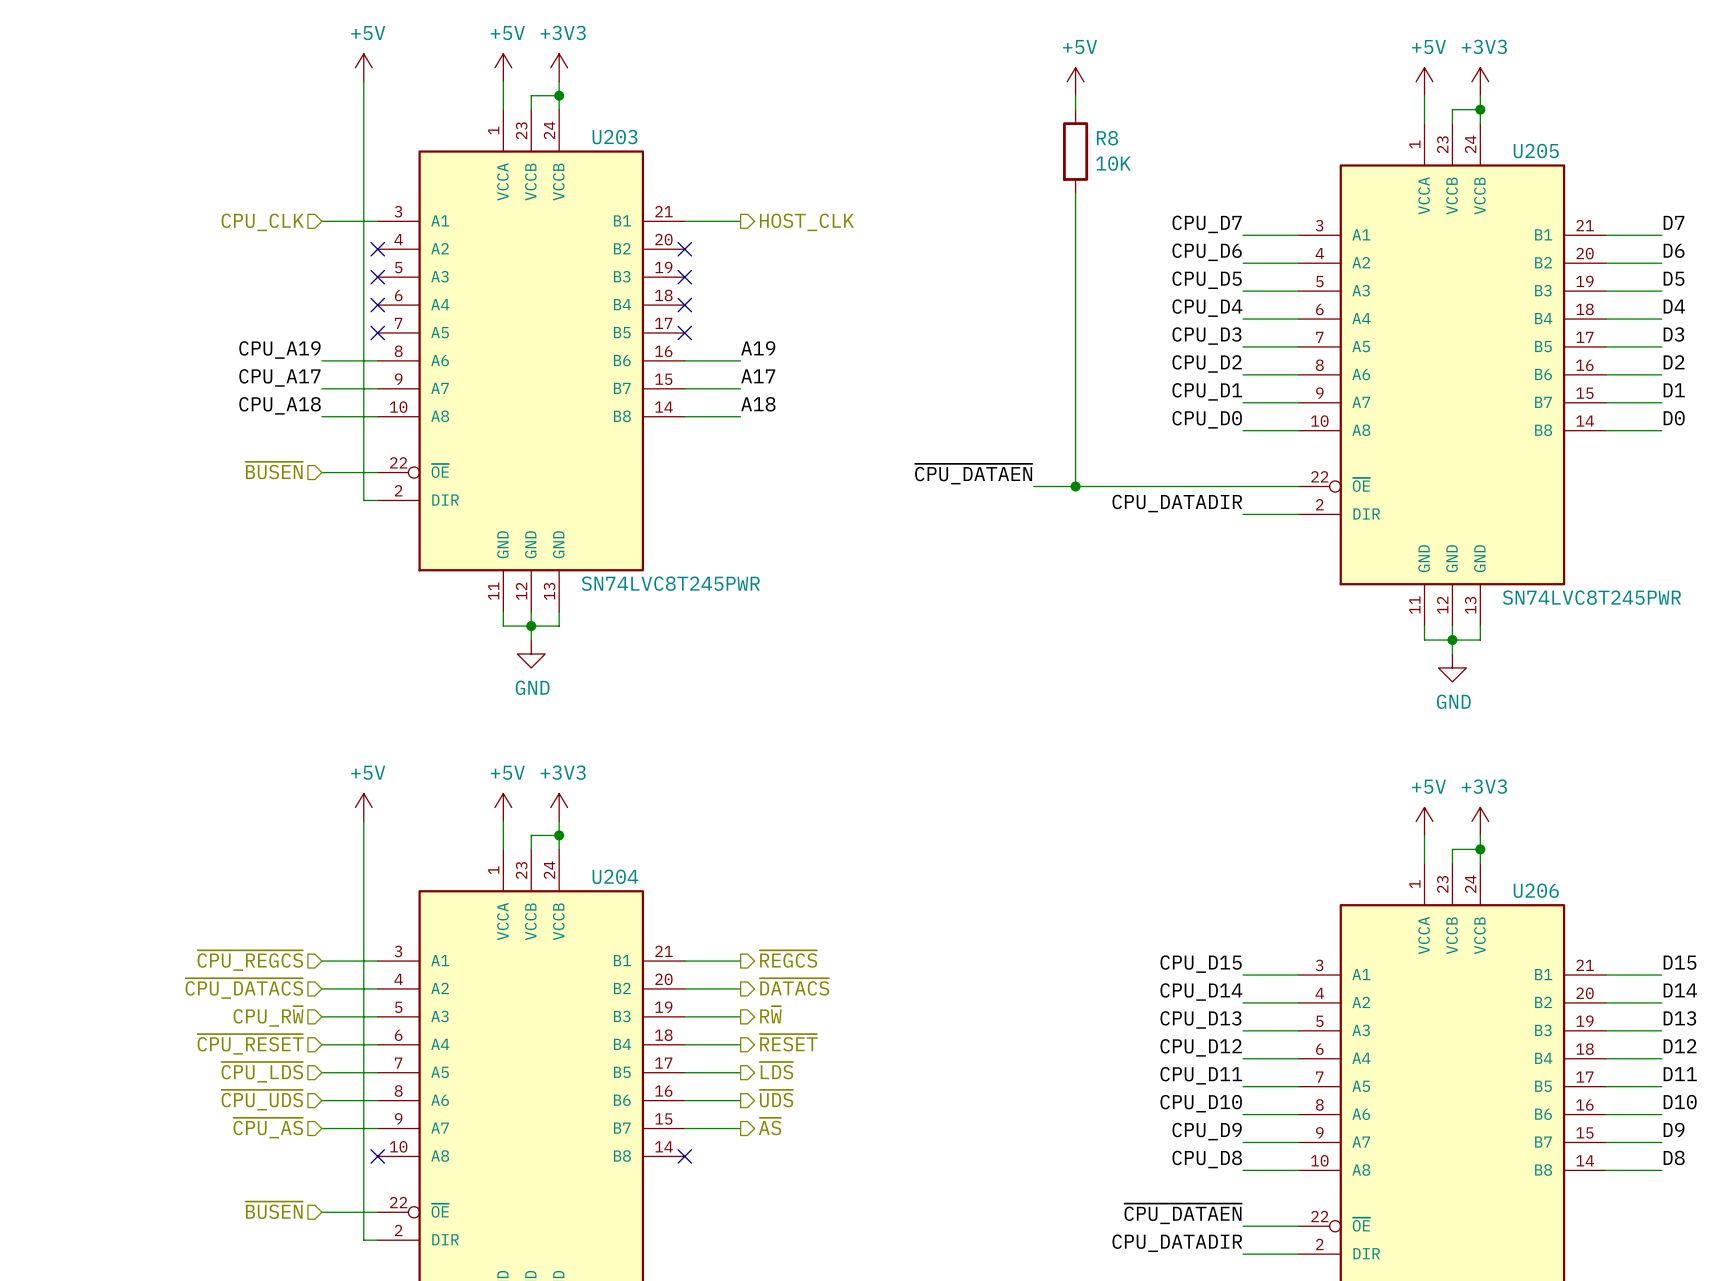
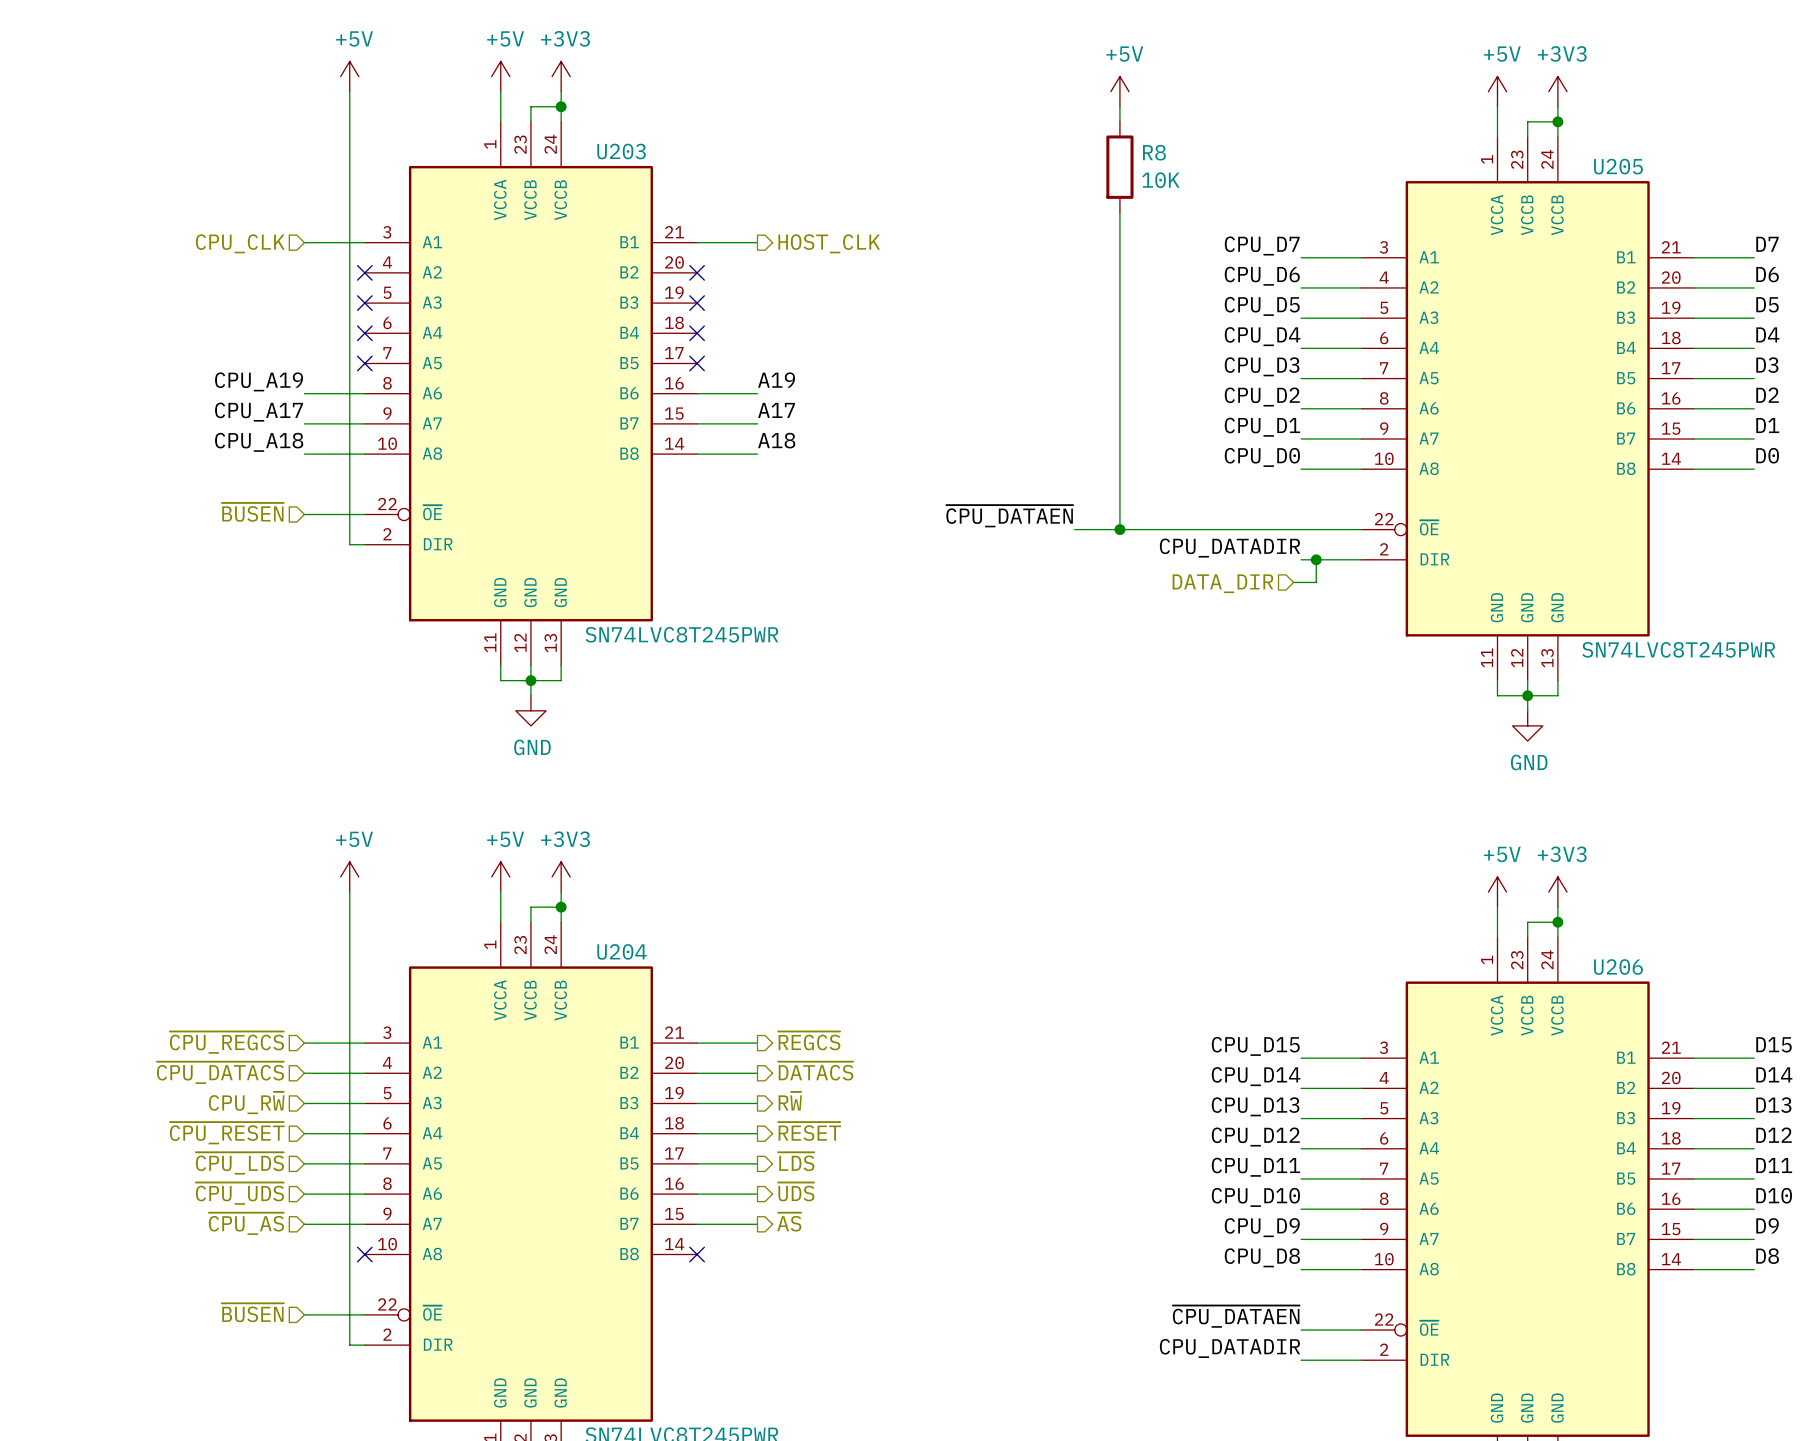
wire: none -> (1316, 559) (1316, 582) (1293, 582)
junction: none -> (1316, 559)
hierarchical label: none -> DATA_DIR (1222, 583)

